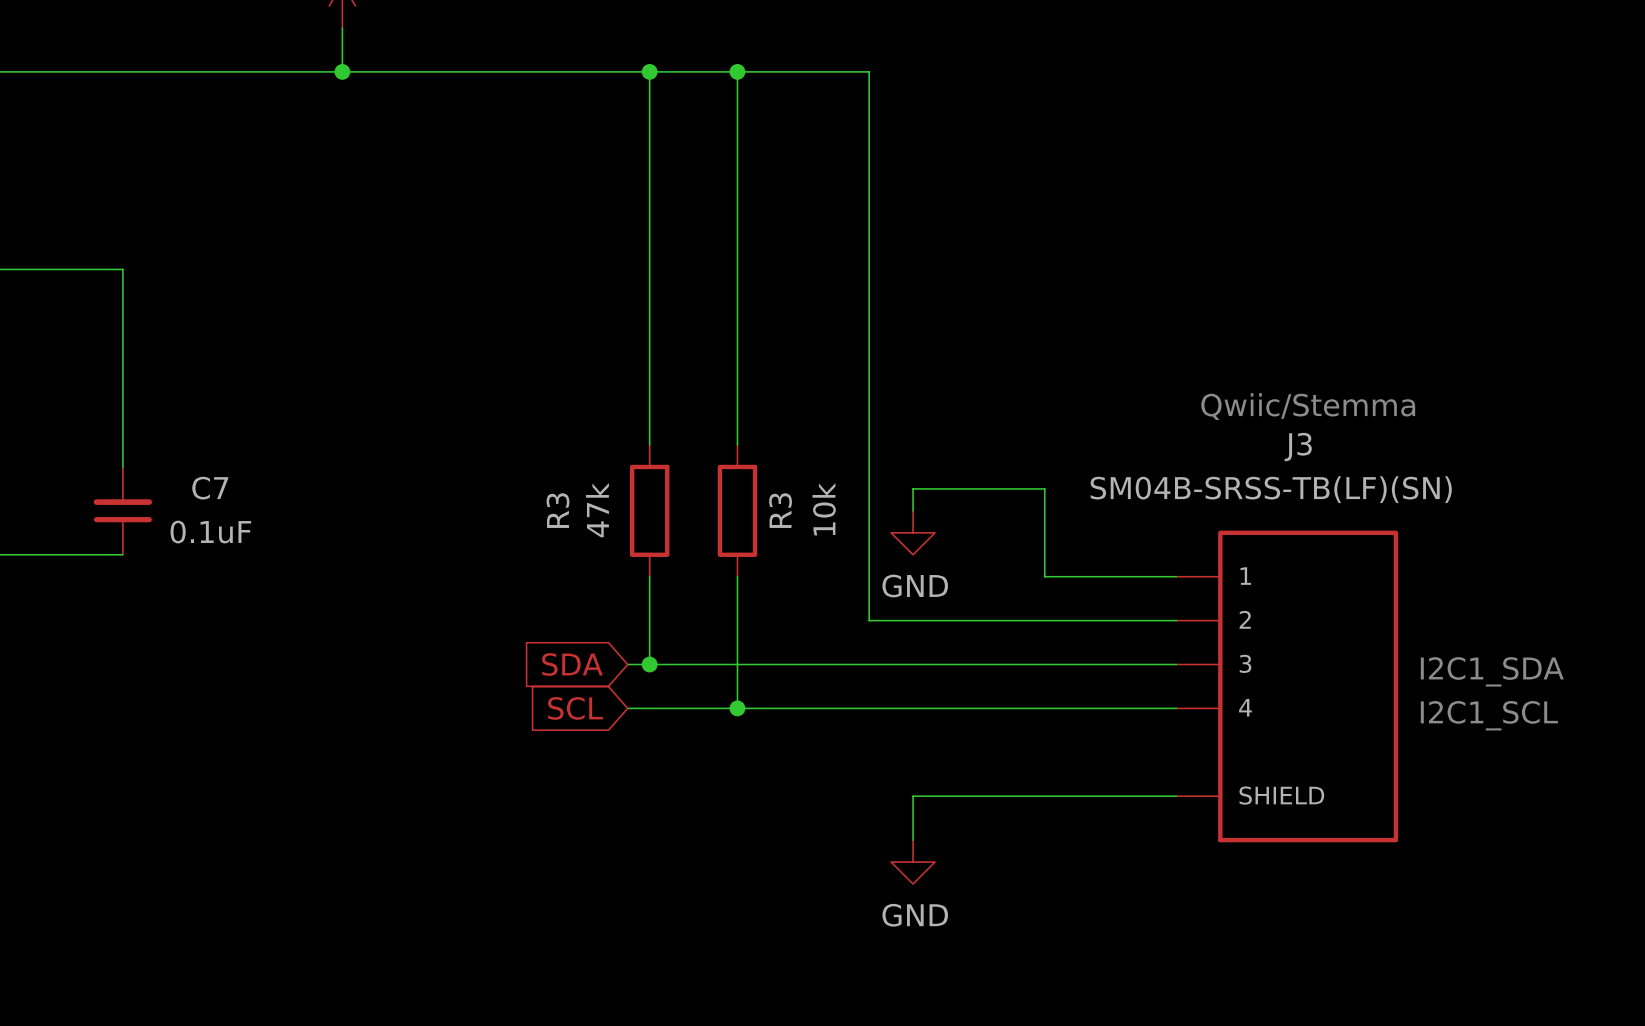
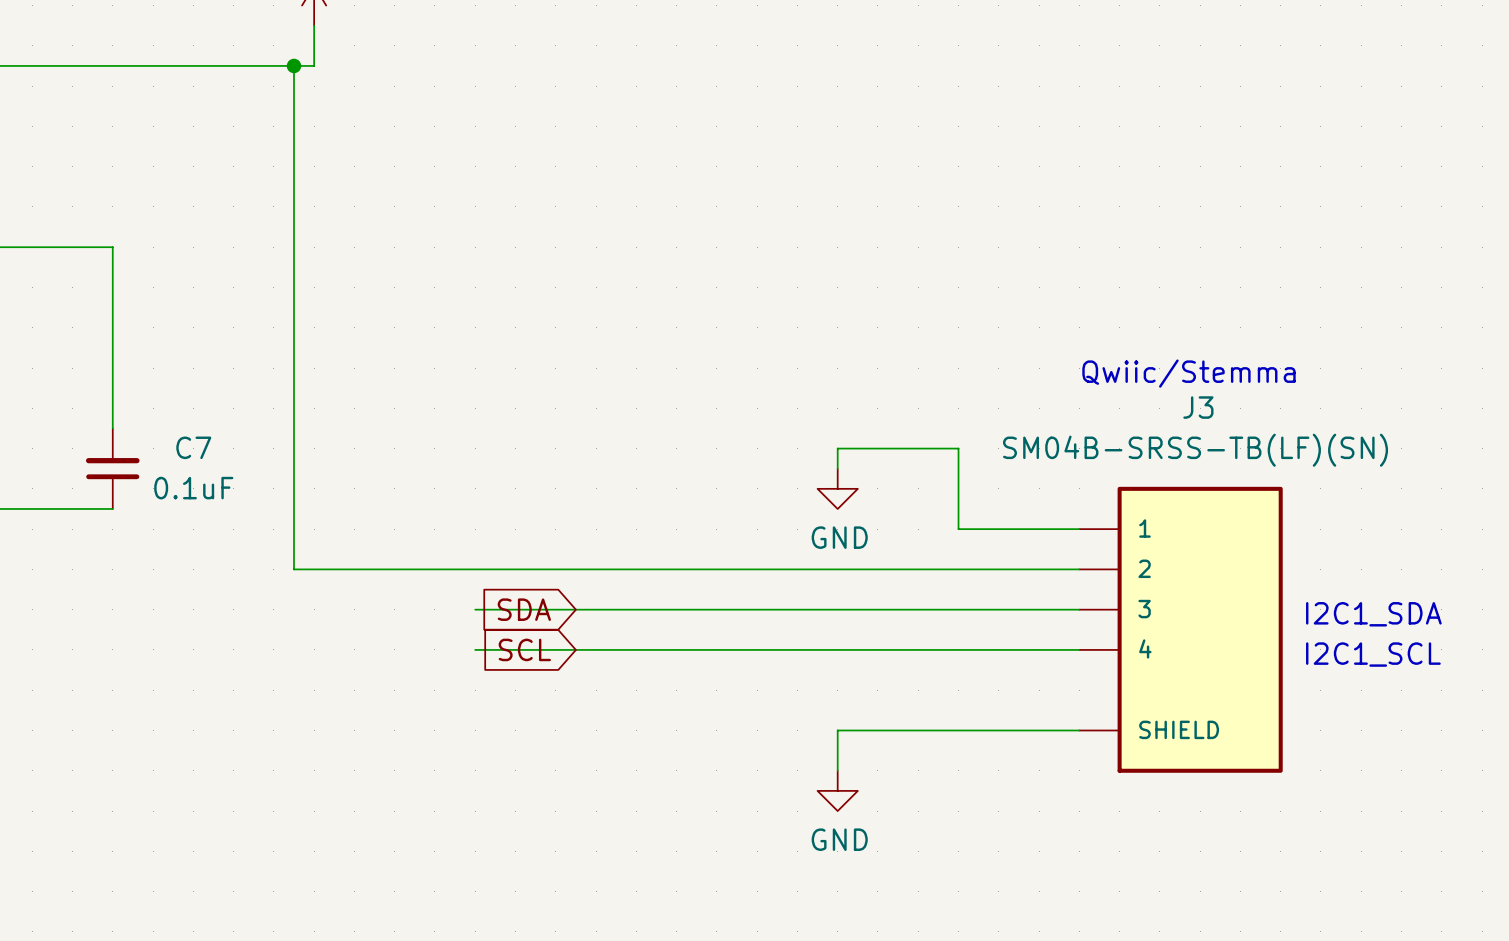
wire: (342, 71) (869, 71) (869, 620) -> (293, 65) (293, 569) (797, 569)
junction position: (342, 71) -> (293, 65)
wire: (649, 71) (649, 445) -> none
junction: (649, 71) -> none
wire: (737, 71) (737, 445) -> none
junction: (737, 71) -> none
R3: 47k (649, 510) -> none
R3: 10k (737, 510) -> none
wire: (649, 576) (649, 664) -> none
wire: (737, 576) (737, 708) -> none
wire: none -> (475, 609) (575, 609)
junction: (649, 664) -> none
wire: none -> (475, 649) (575, 649)
junction: (737, 708) -> none

